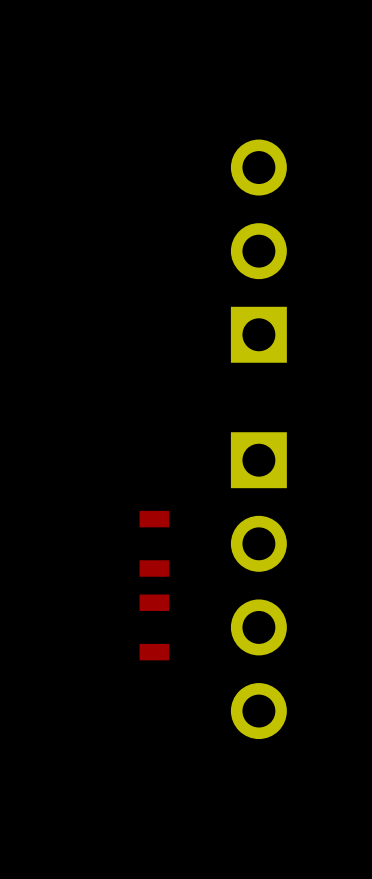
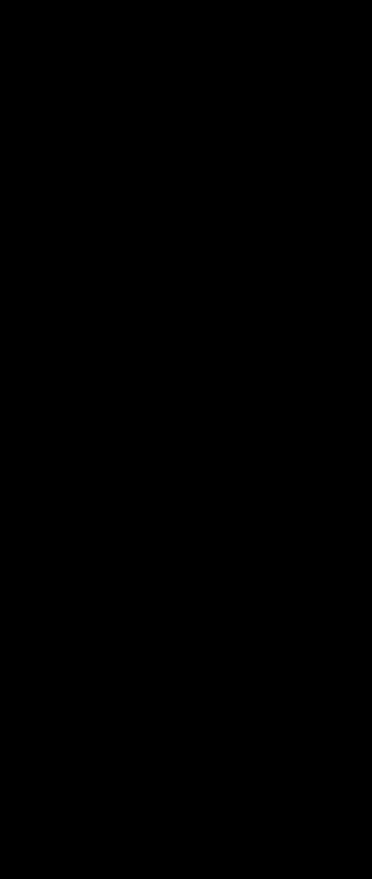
part: (258, 251) -> none
part: (154, 543) -> none
part: (258, 585) -> none
part: (154, 627) -> none

